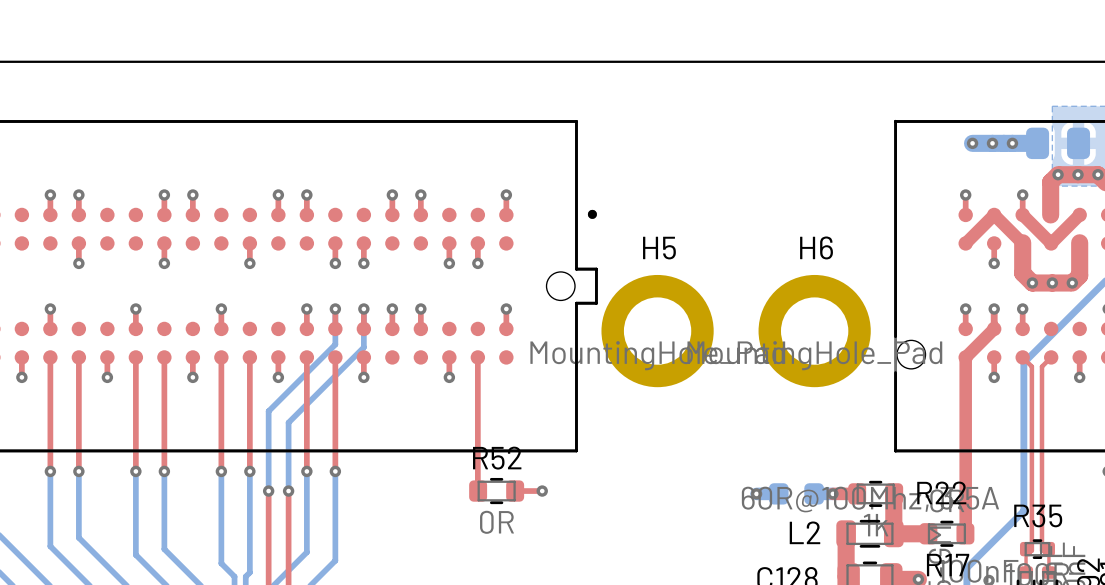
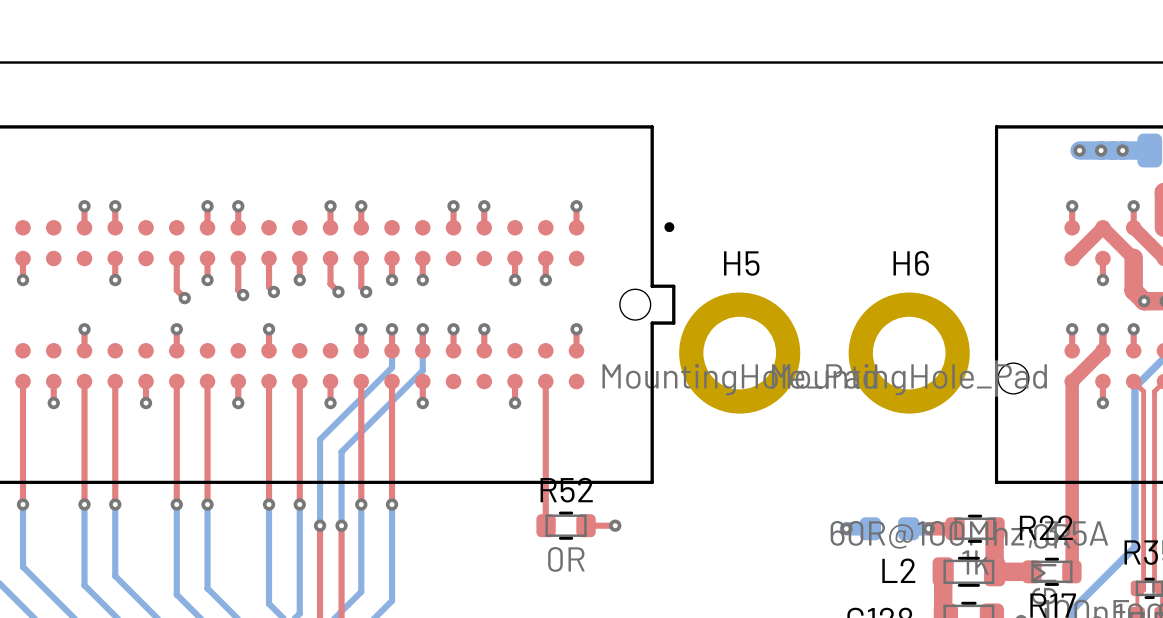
top track: none -> (176, 258) (176, 290) (184, 298)
top track: none -> (238, 258) (238, 290) (243, 295)
top track: none -> (269, 258) (269, 287) (273, 291)
top track: none -> (330, 258) (330, 284) (338, 291)
top track: none -> (361, 258) (361, 287) (366, 291)
via: none -> (273, 291)
via: none -> (338, 291)
via: none -> (366, 291)
via: none -> (243, 295)
via: none -> (184, 298)

